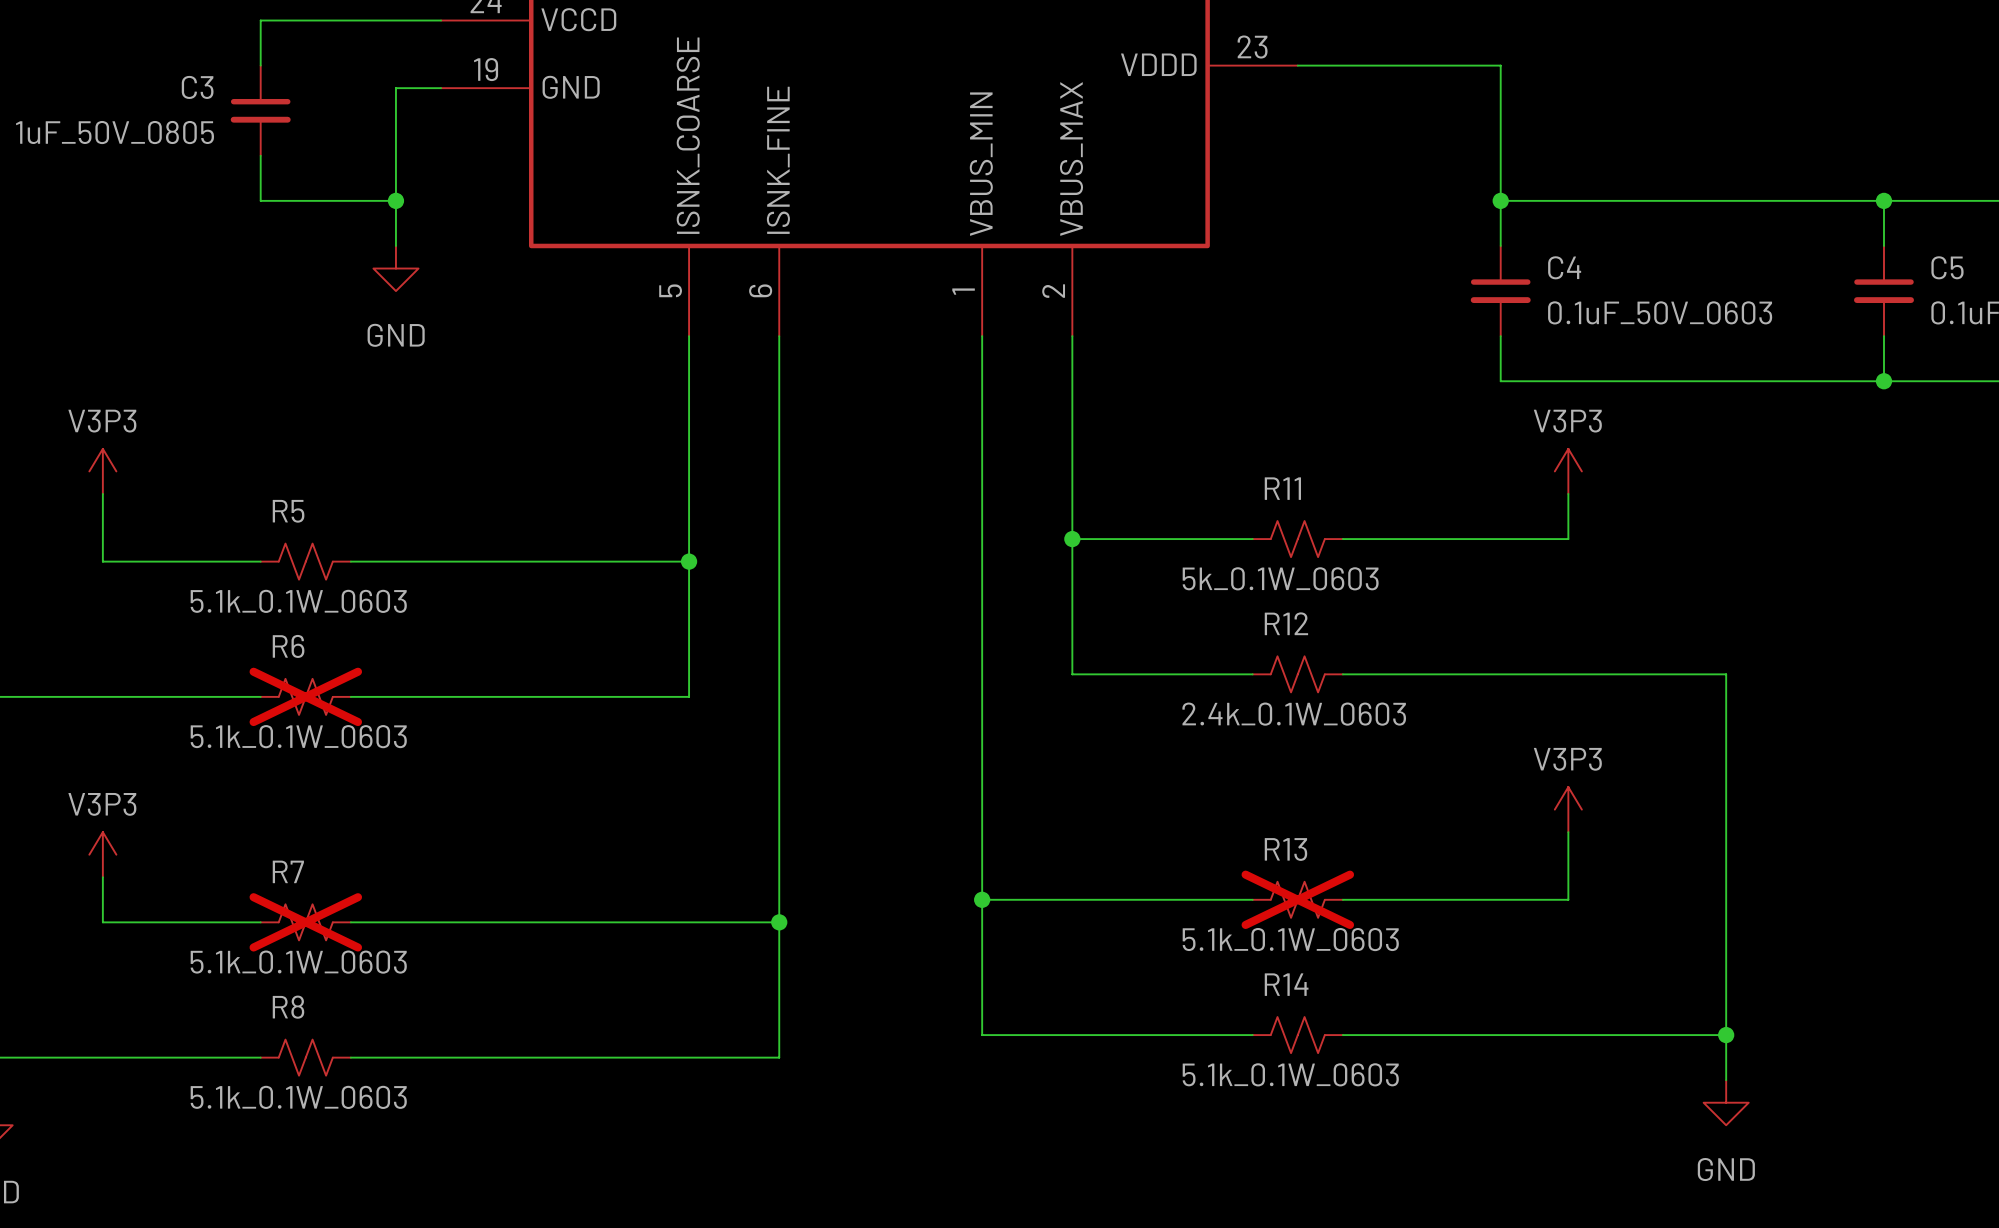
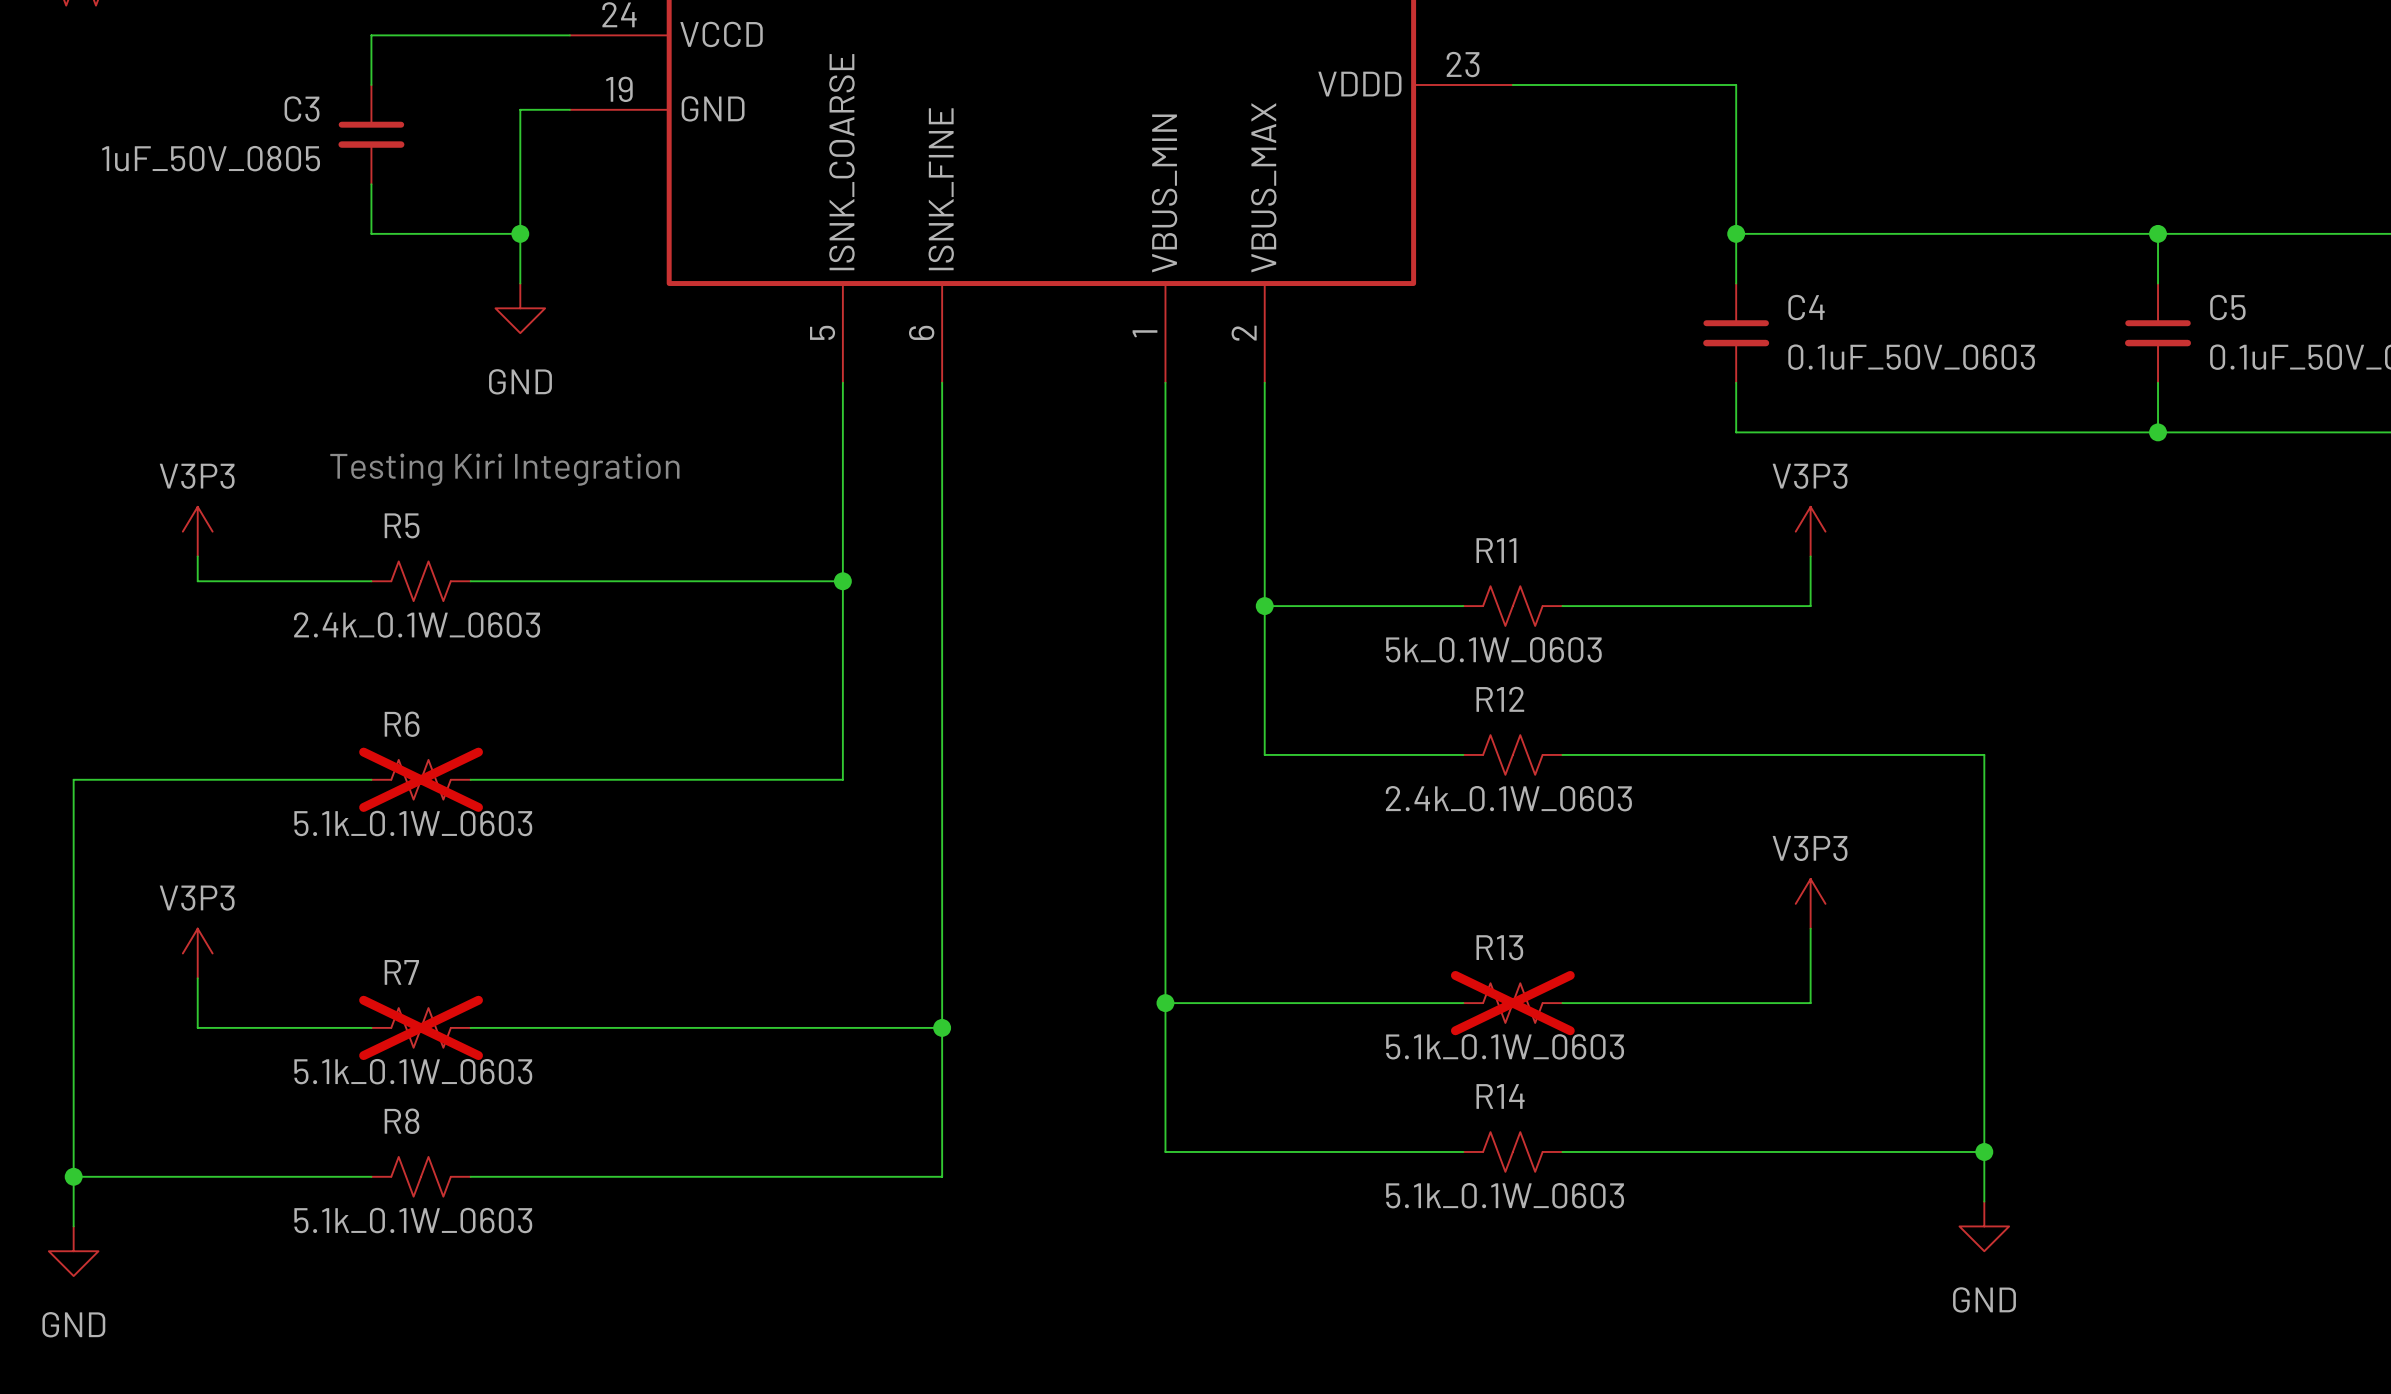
text: none -> Testing Kiri Integration (504, 469)
wire: (102, 516) (102, 561) (260, 561) -> (197, 581) (371, 581)
R5 position: (305, 561) -> (421, 581)
wire: (350, 561) (689, 561) -> (470, 581) (842, 581)
junction position: (689, 561) -> (842, 581)
R5 value: 5.1k_0.1W_0603 (298, 601) -> 2.4k_0.1W_0603 (417, 625)

